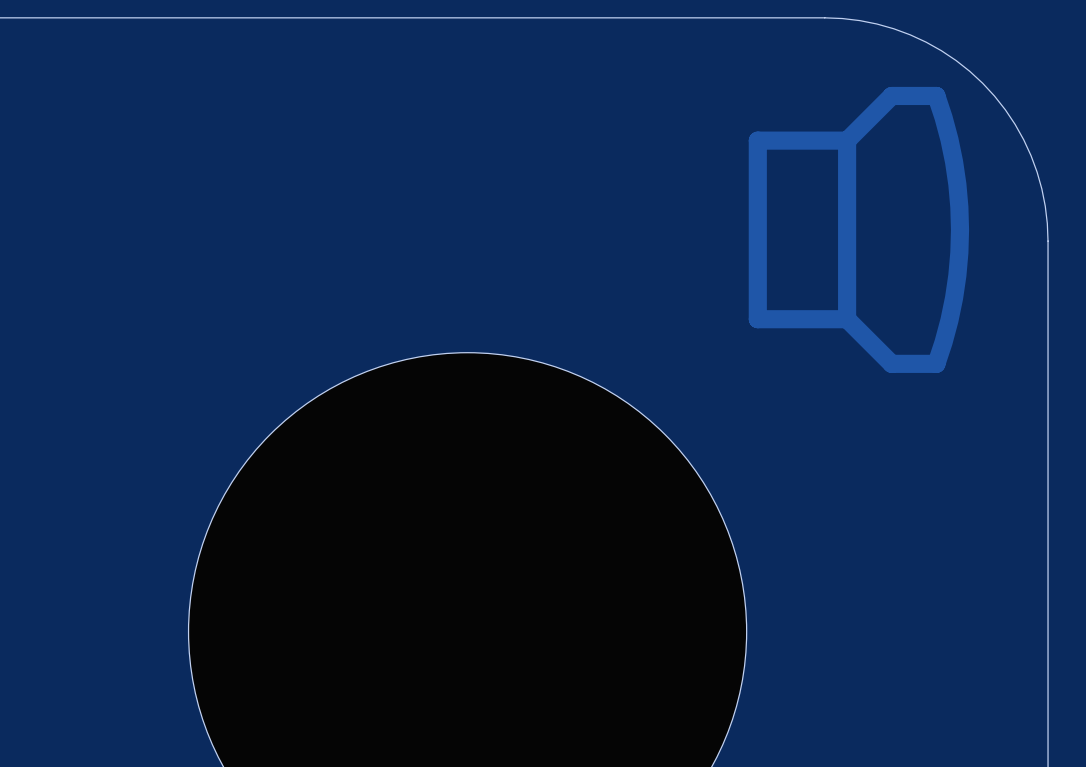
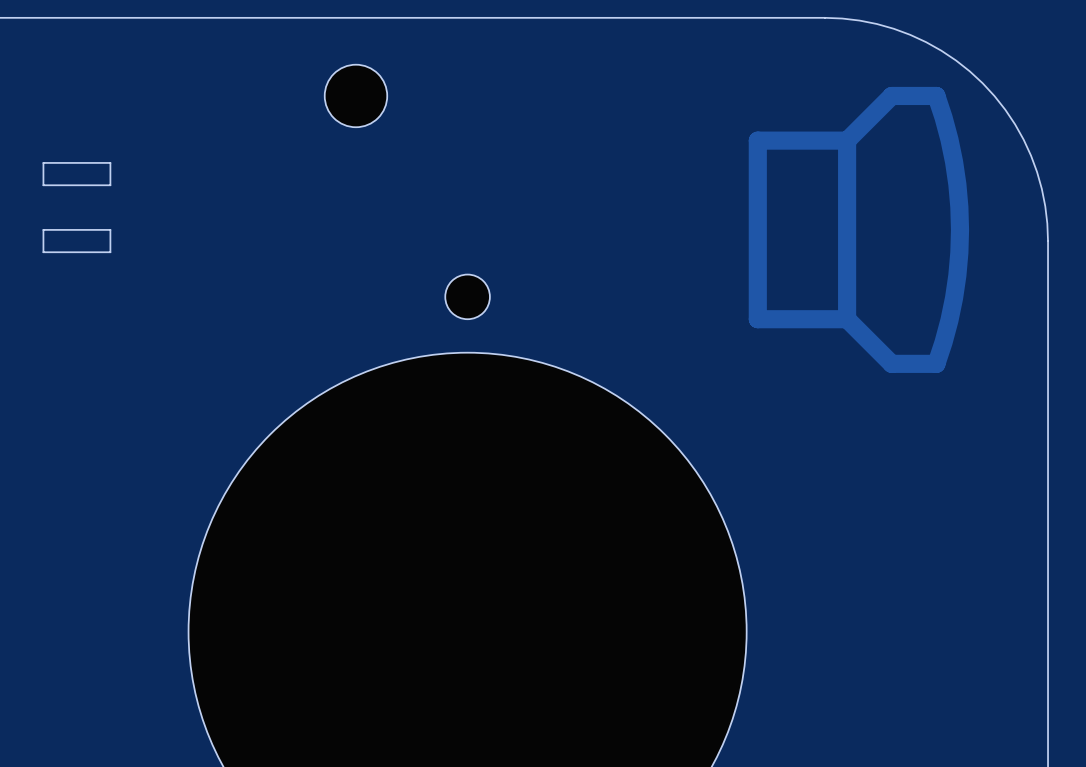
hole: none -> (355, 95)
board edge: none -> (43, 162) (110, 162) (110, 185) (43, 185) (43, 162)
board edge: none -> (43, 229) (43, 252) (110, 252) (110, 229) (43, 229)
hole: none -> (467, 296)

